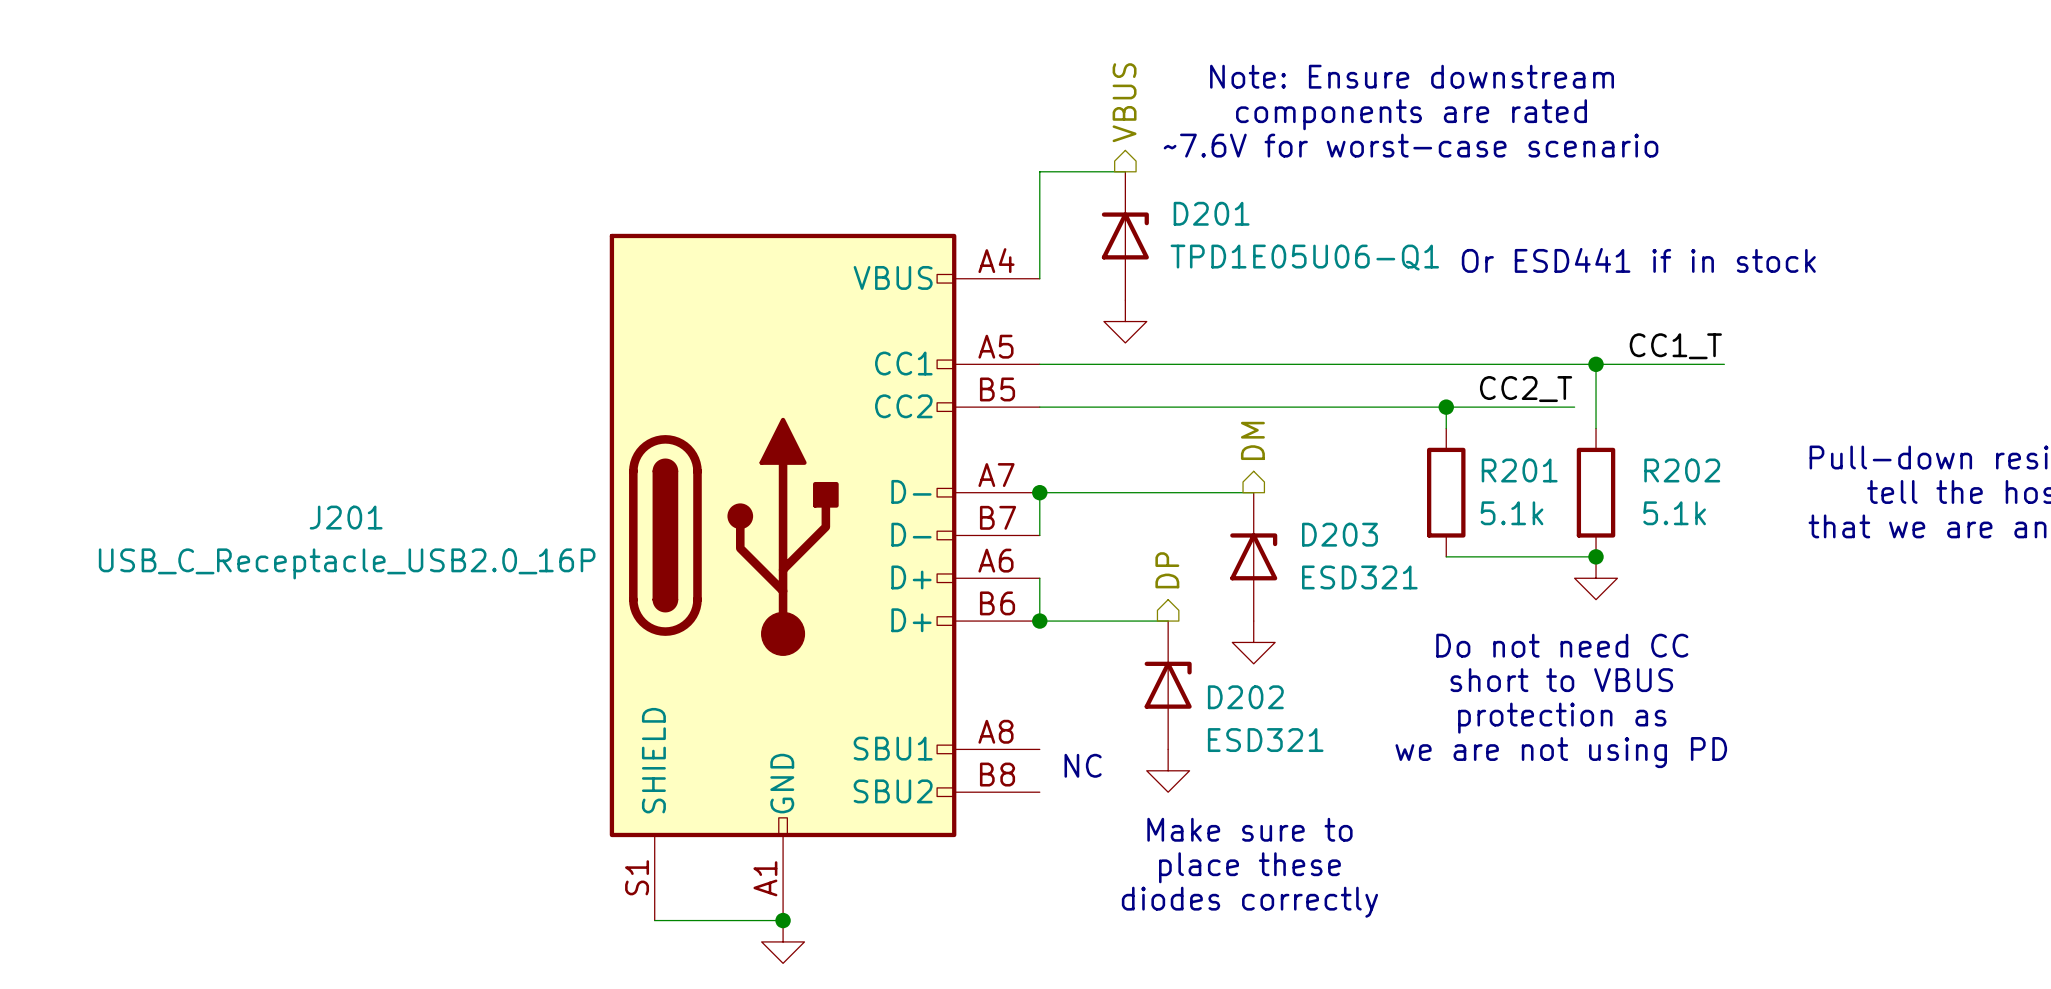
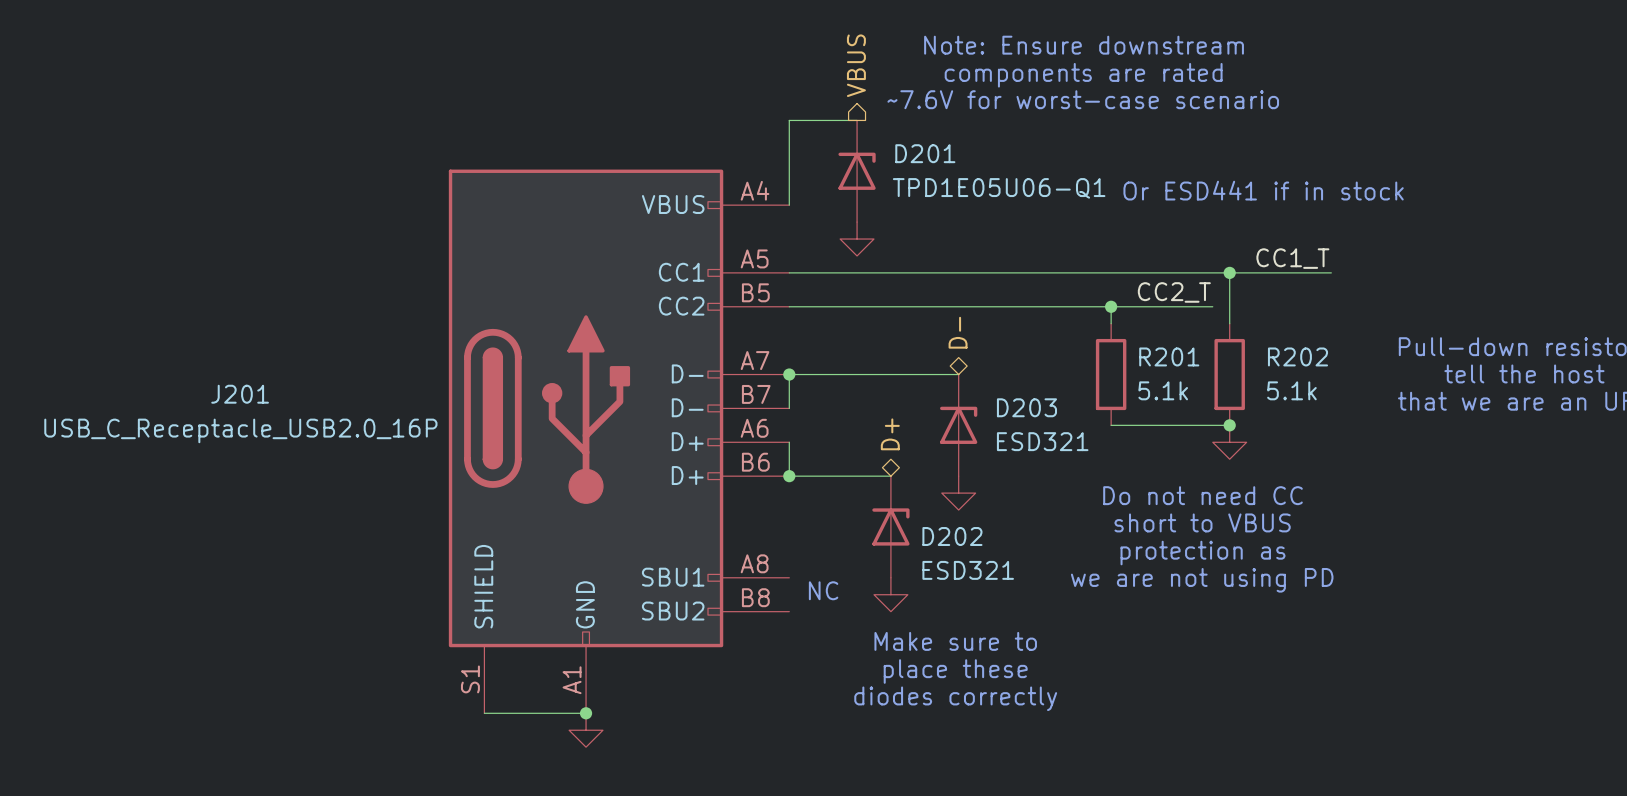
hierarchical label shape: output (1252, 440) -> bidirectional (958, 332)
hierarchical label: DM (1252, 440) -> D- (958, 332)
hierarchical label shape: output (1167, 570) -> bidirectional (890, 434)
hierarchical label: DP (1167, 570) -> D+ (890, 434)

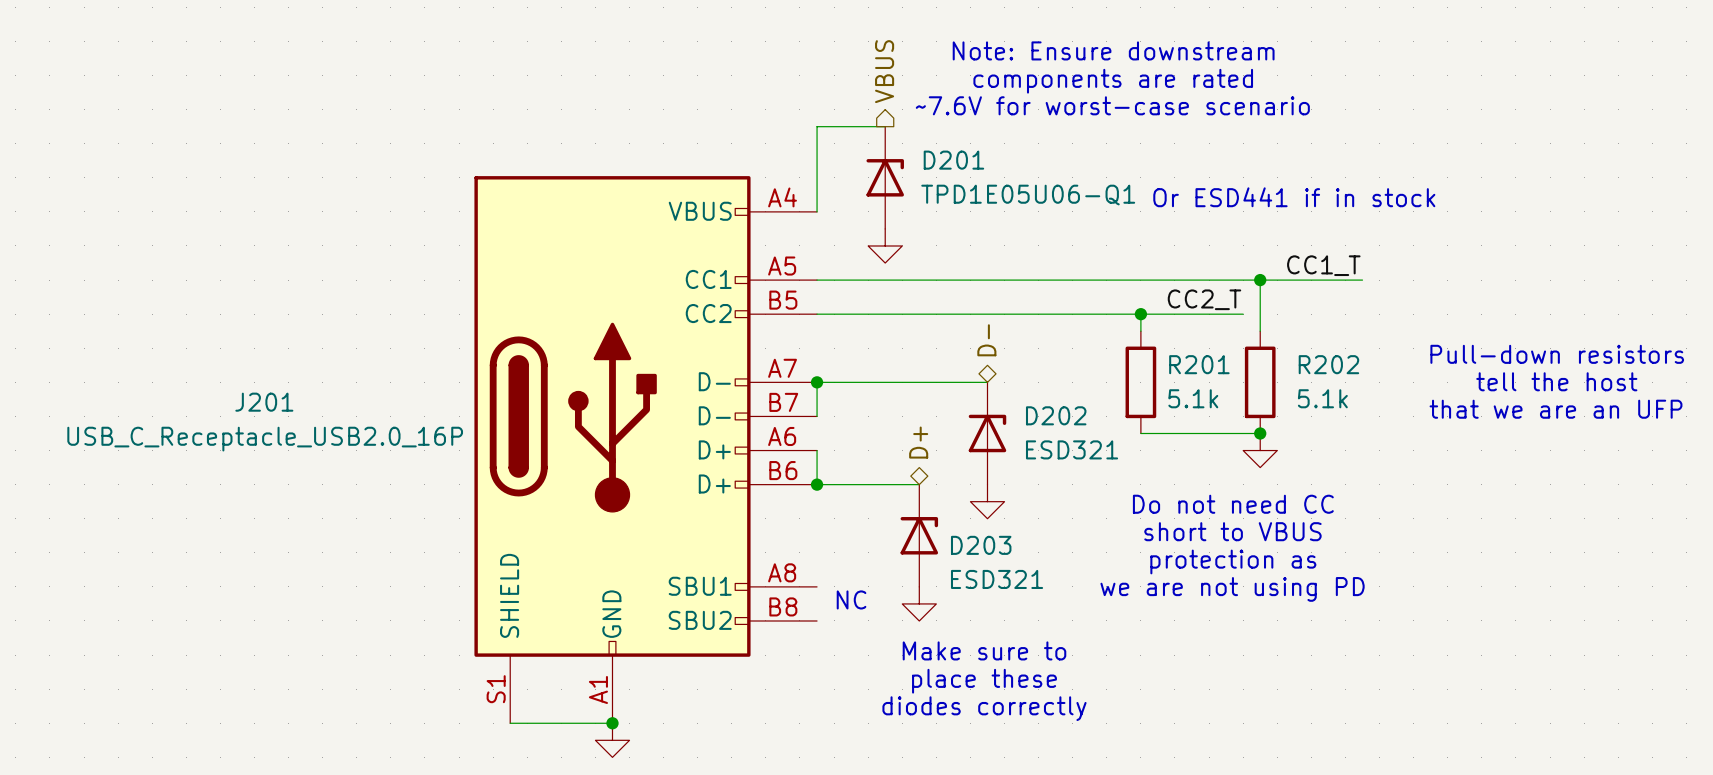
D203 name: D203 (1026, 407) -> D202 (1056, 415)
D202 name: D202 (952, 536) -> D203 (981, 545)

